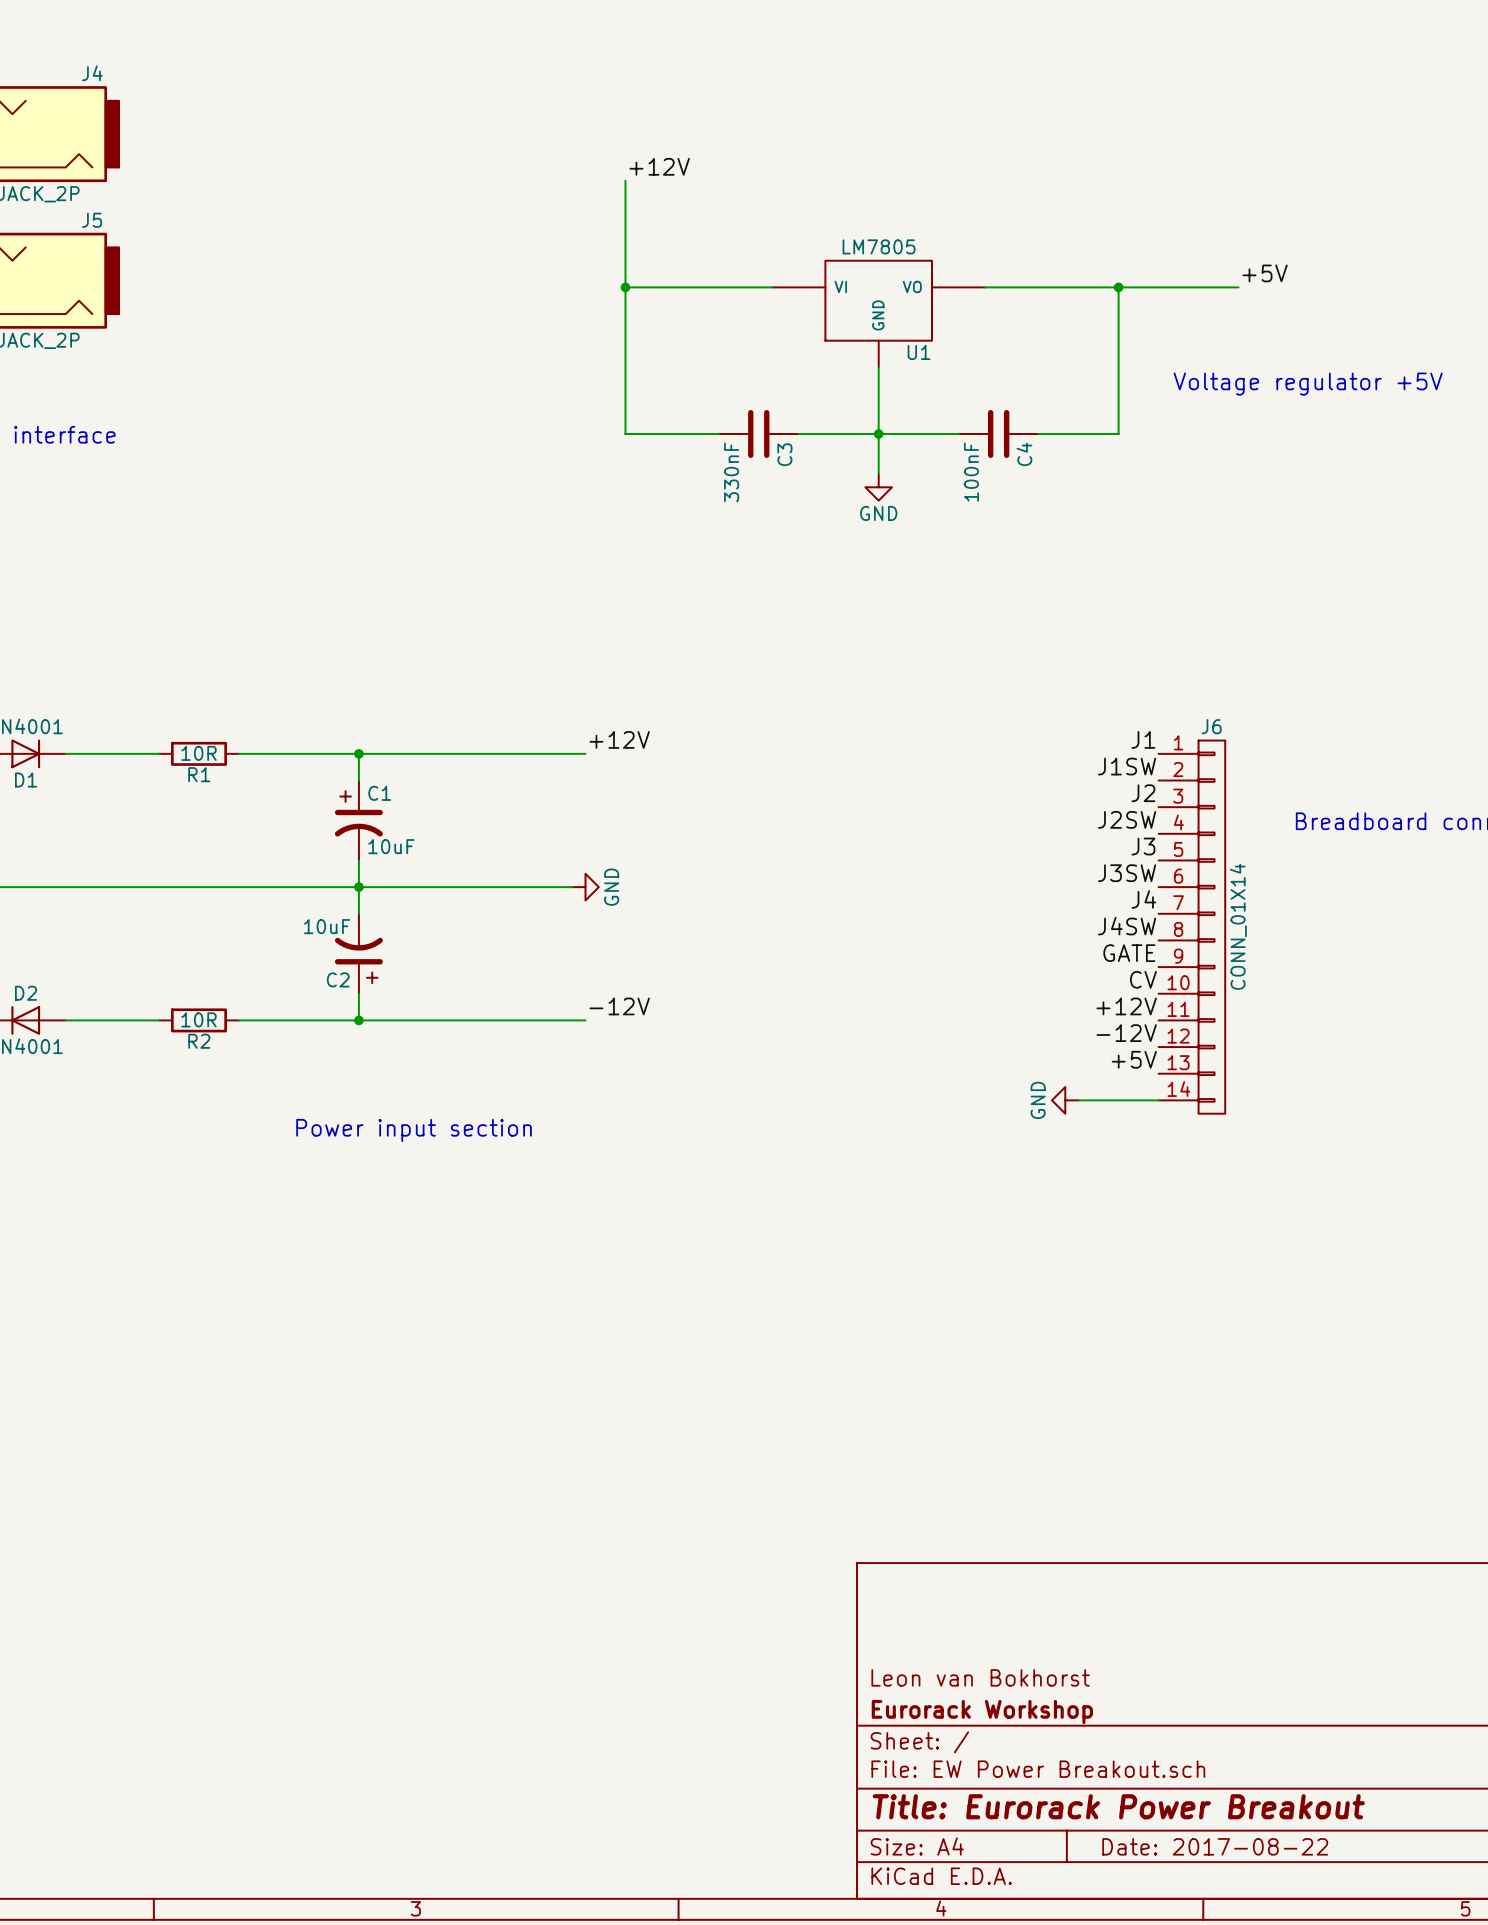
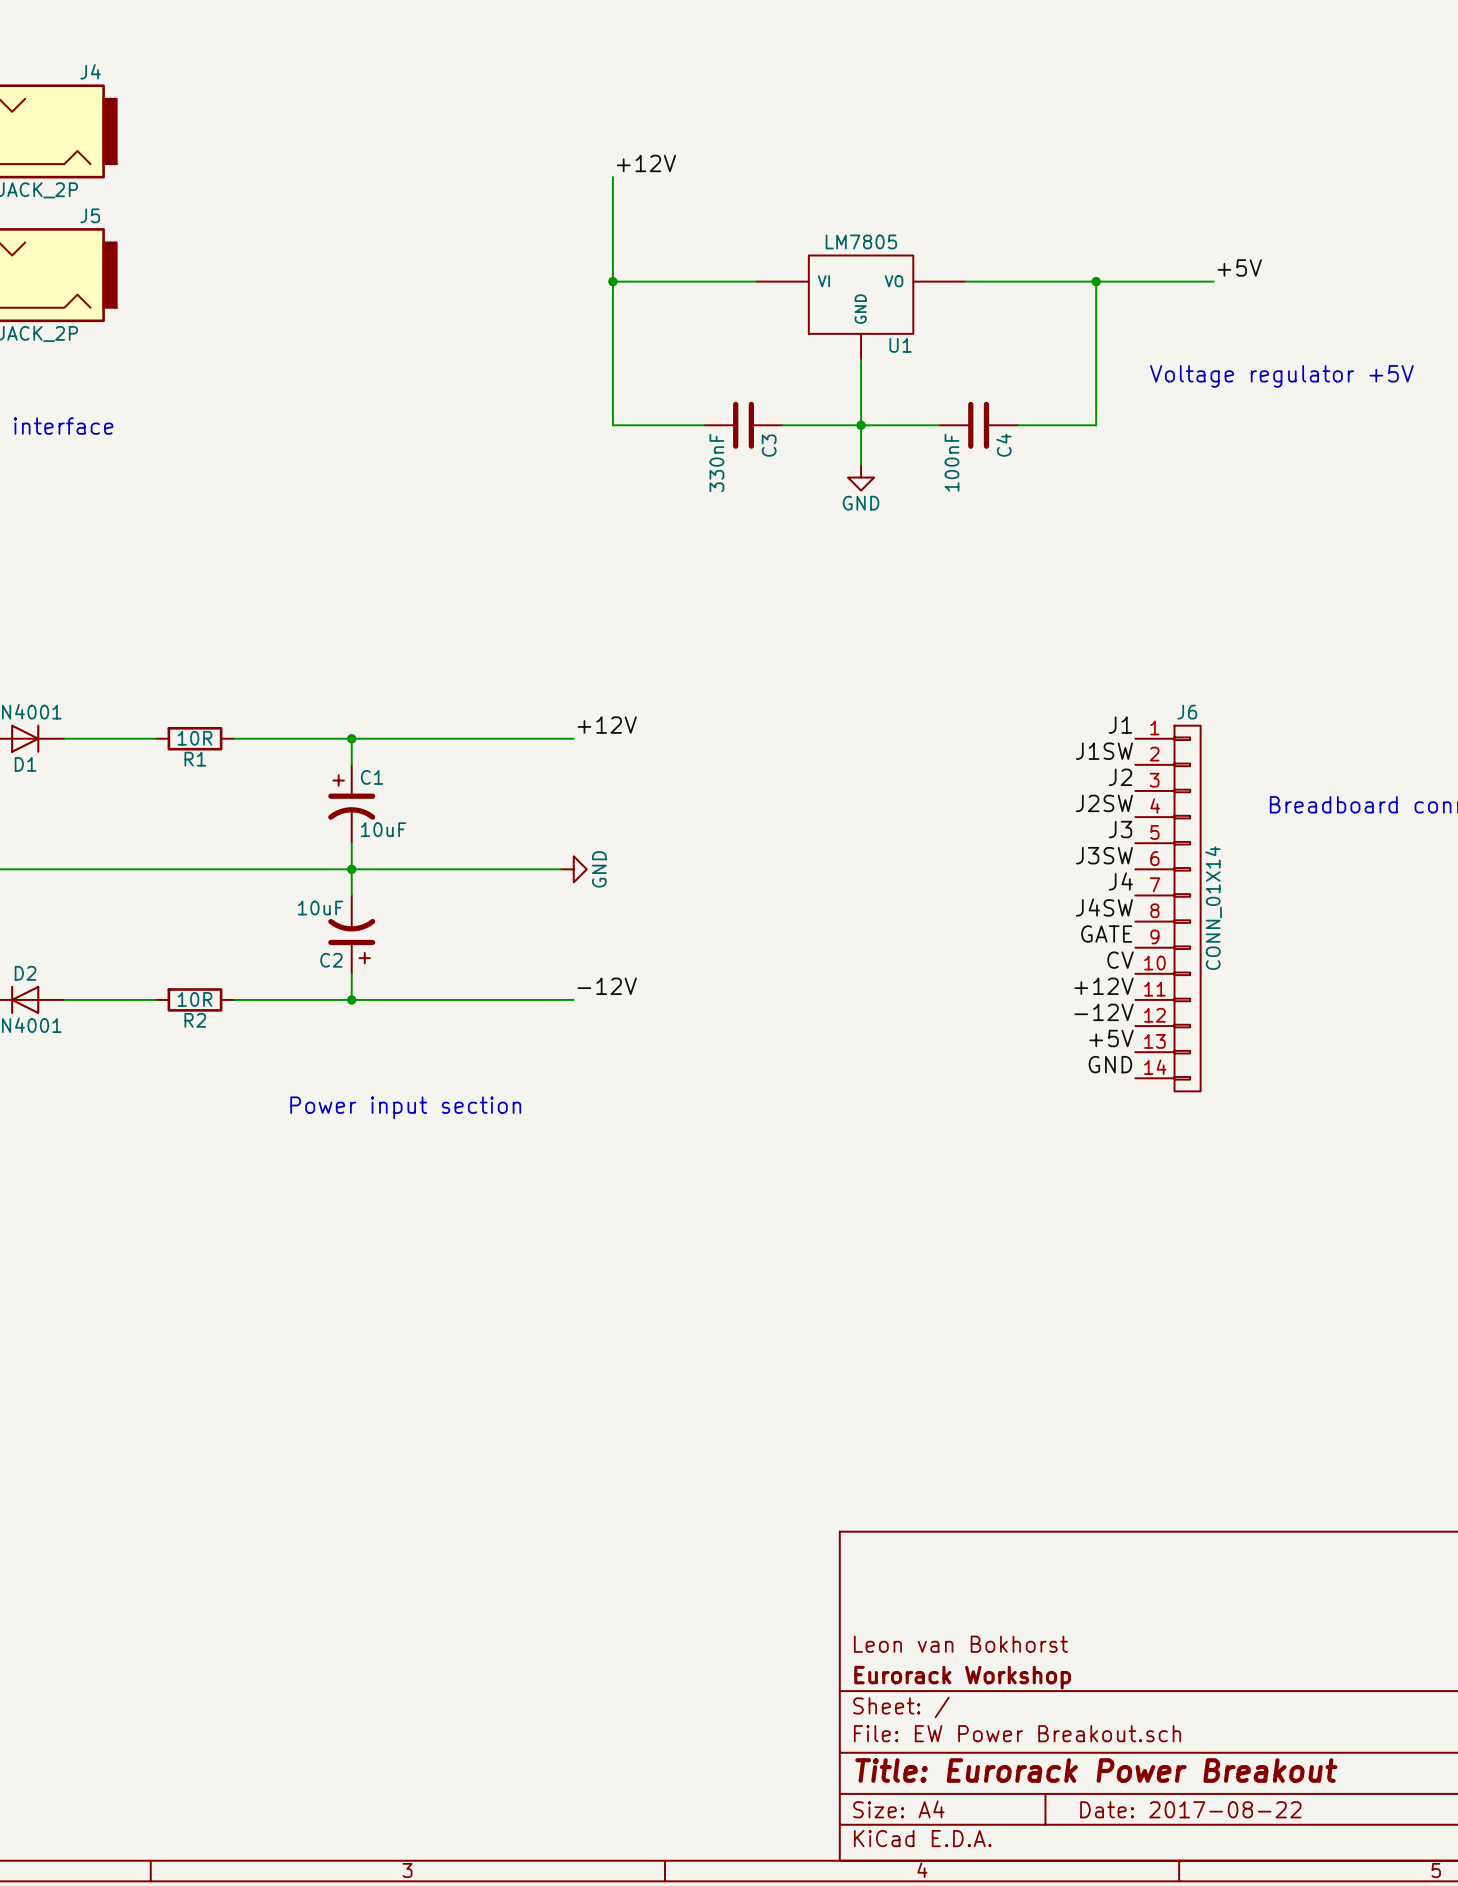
label: none -> GND (1110, 1064)
power symbol: GND (1065, 1100) -> none
wire: (1078, 1100) (1158, 1100) -> none

